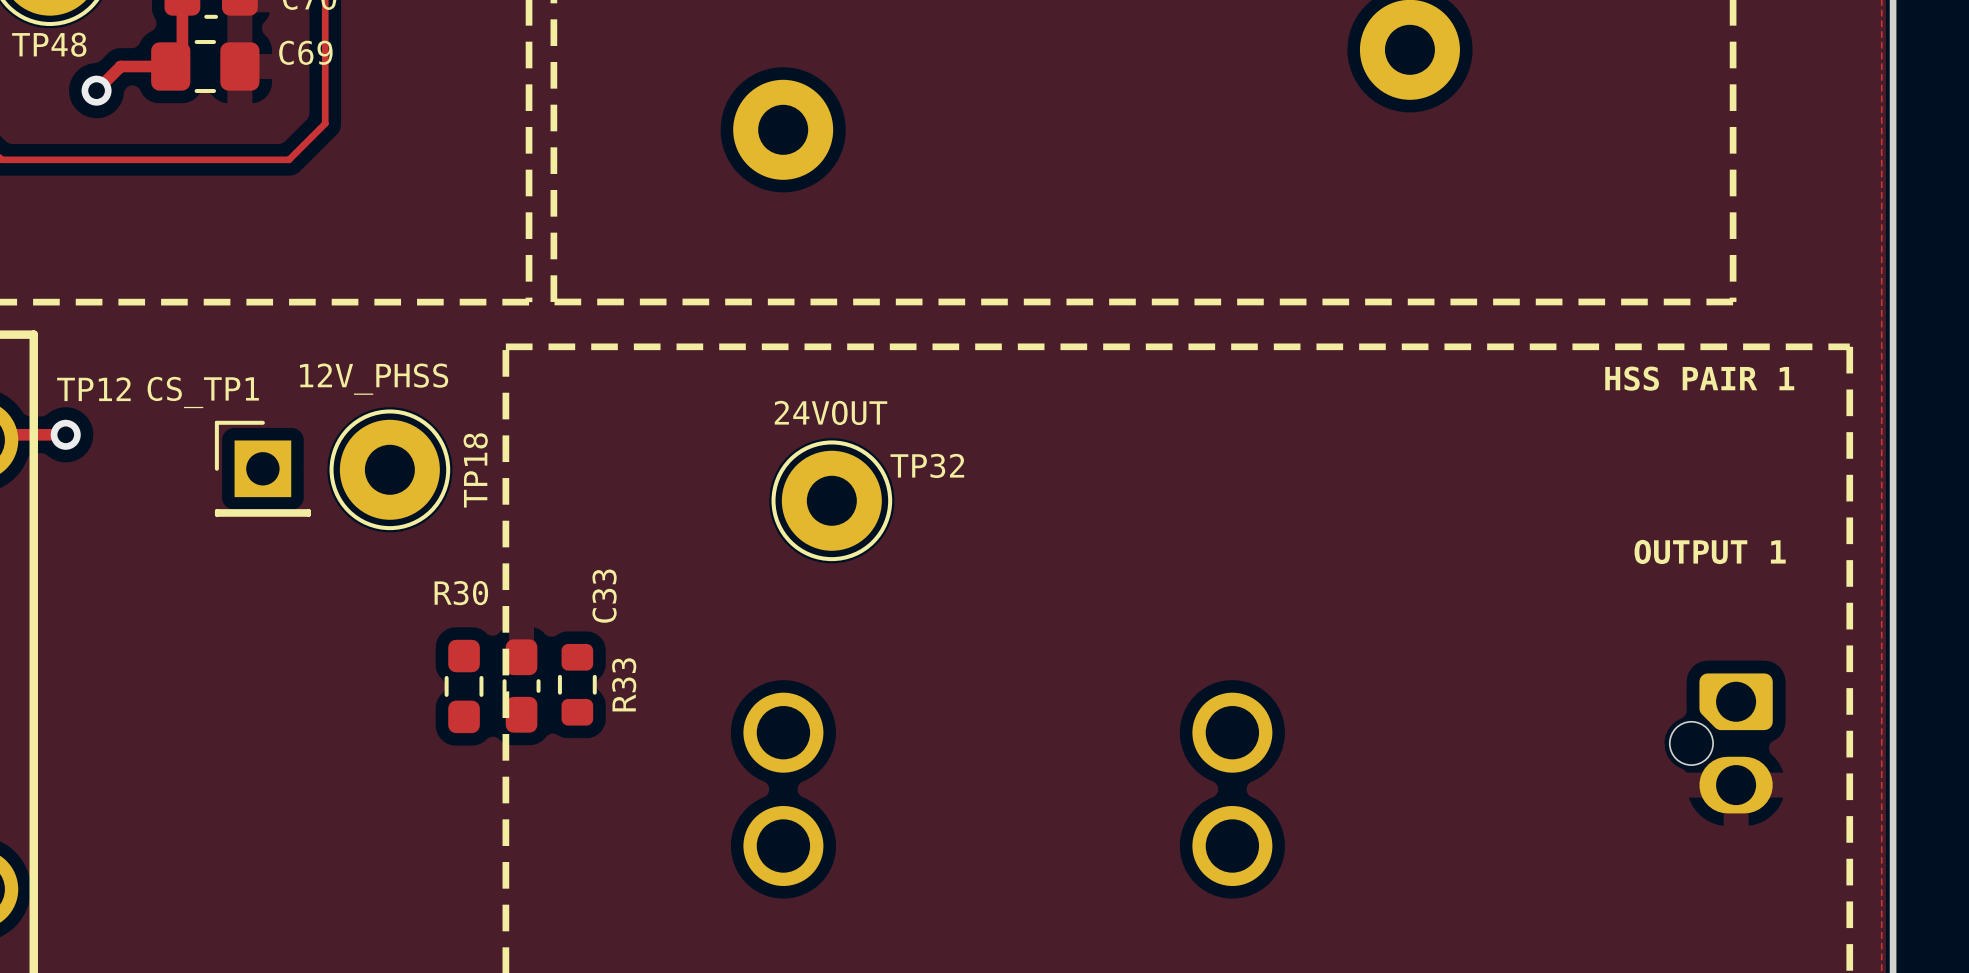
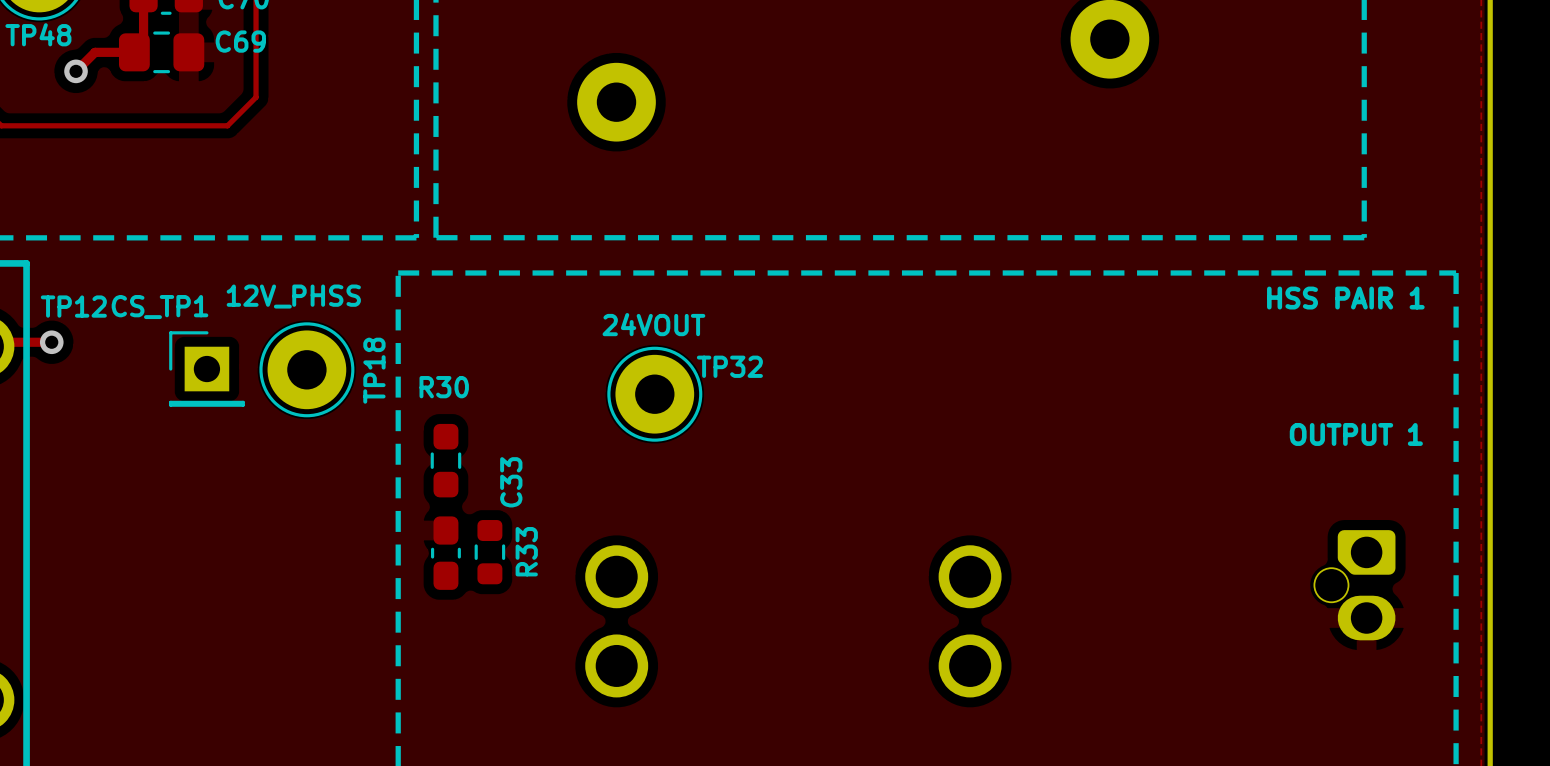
R33 position: (577, 684) -> (489, 552)
R30 position: (464, 686) -> (445, 460)
C33 position: (521, 686) -> (445, 553)

